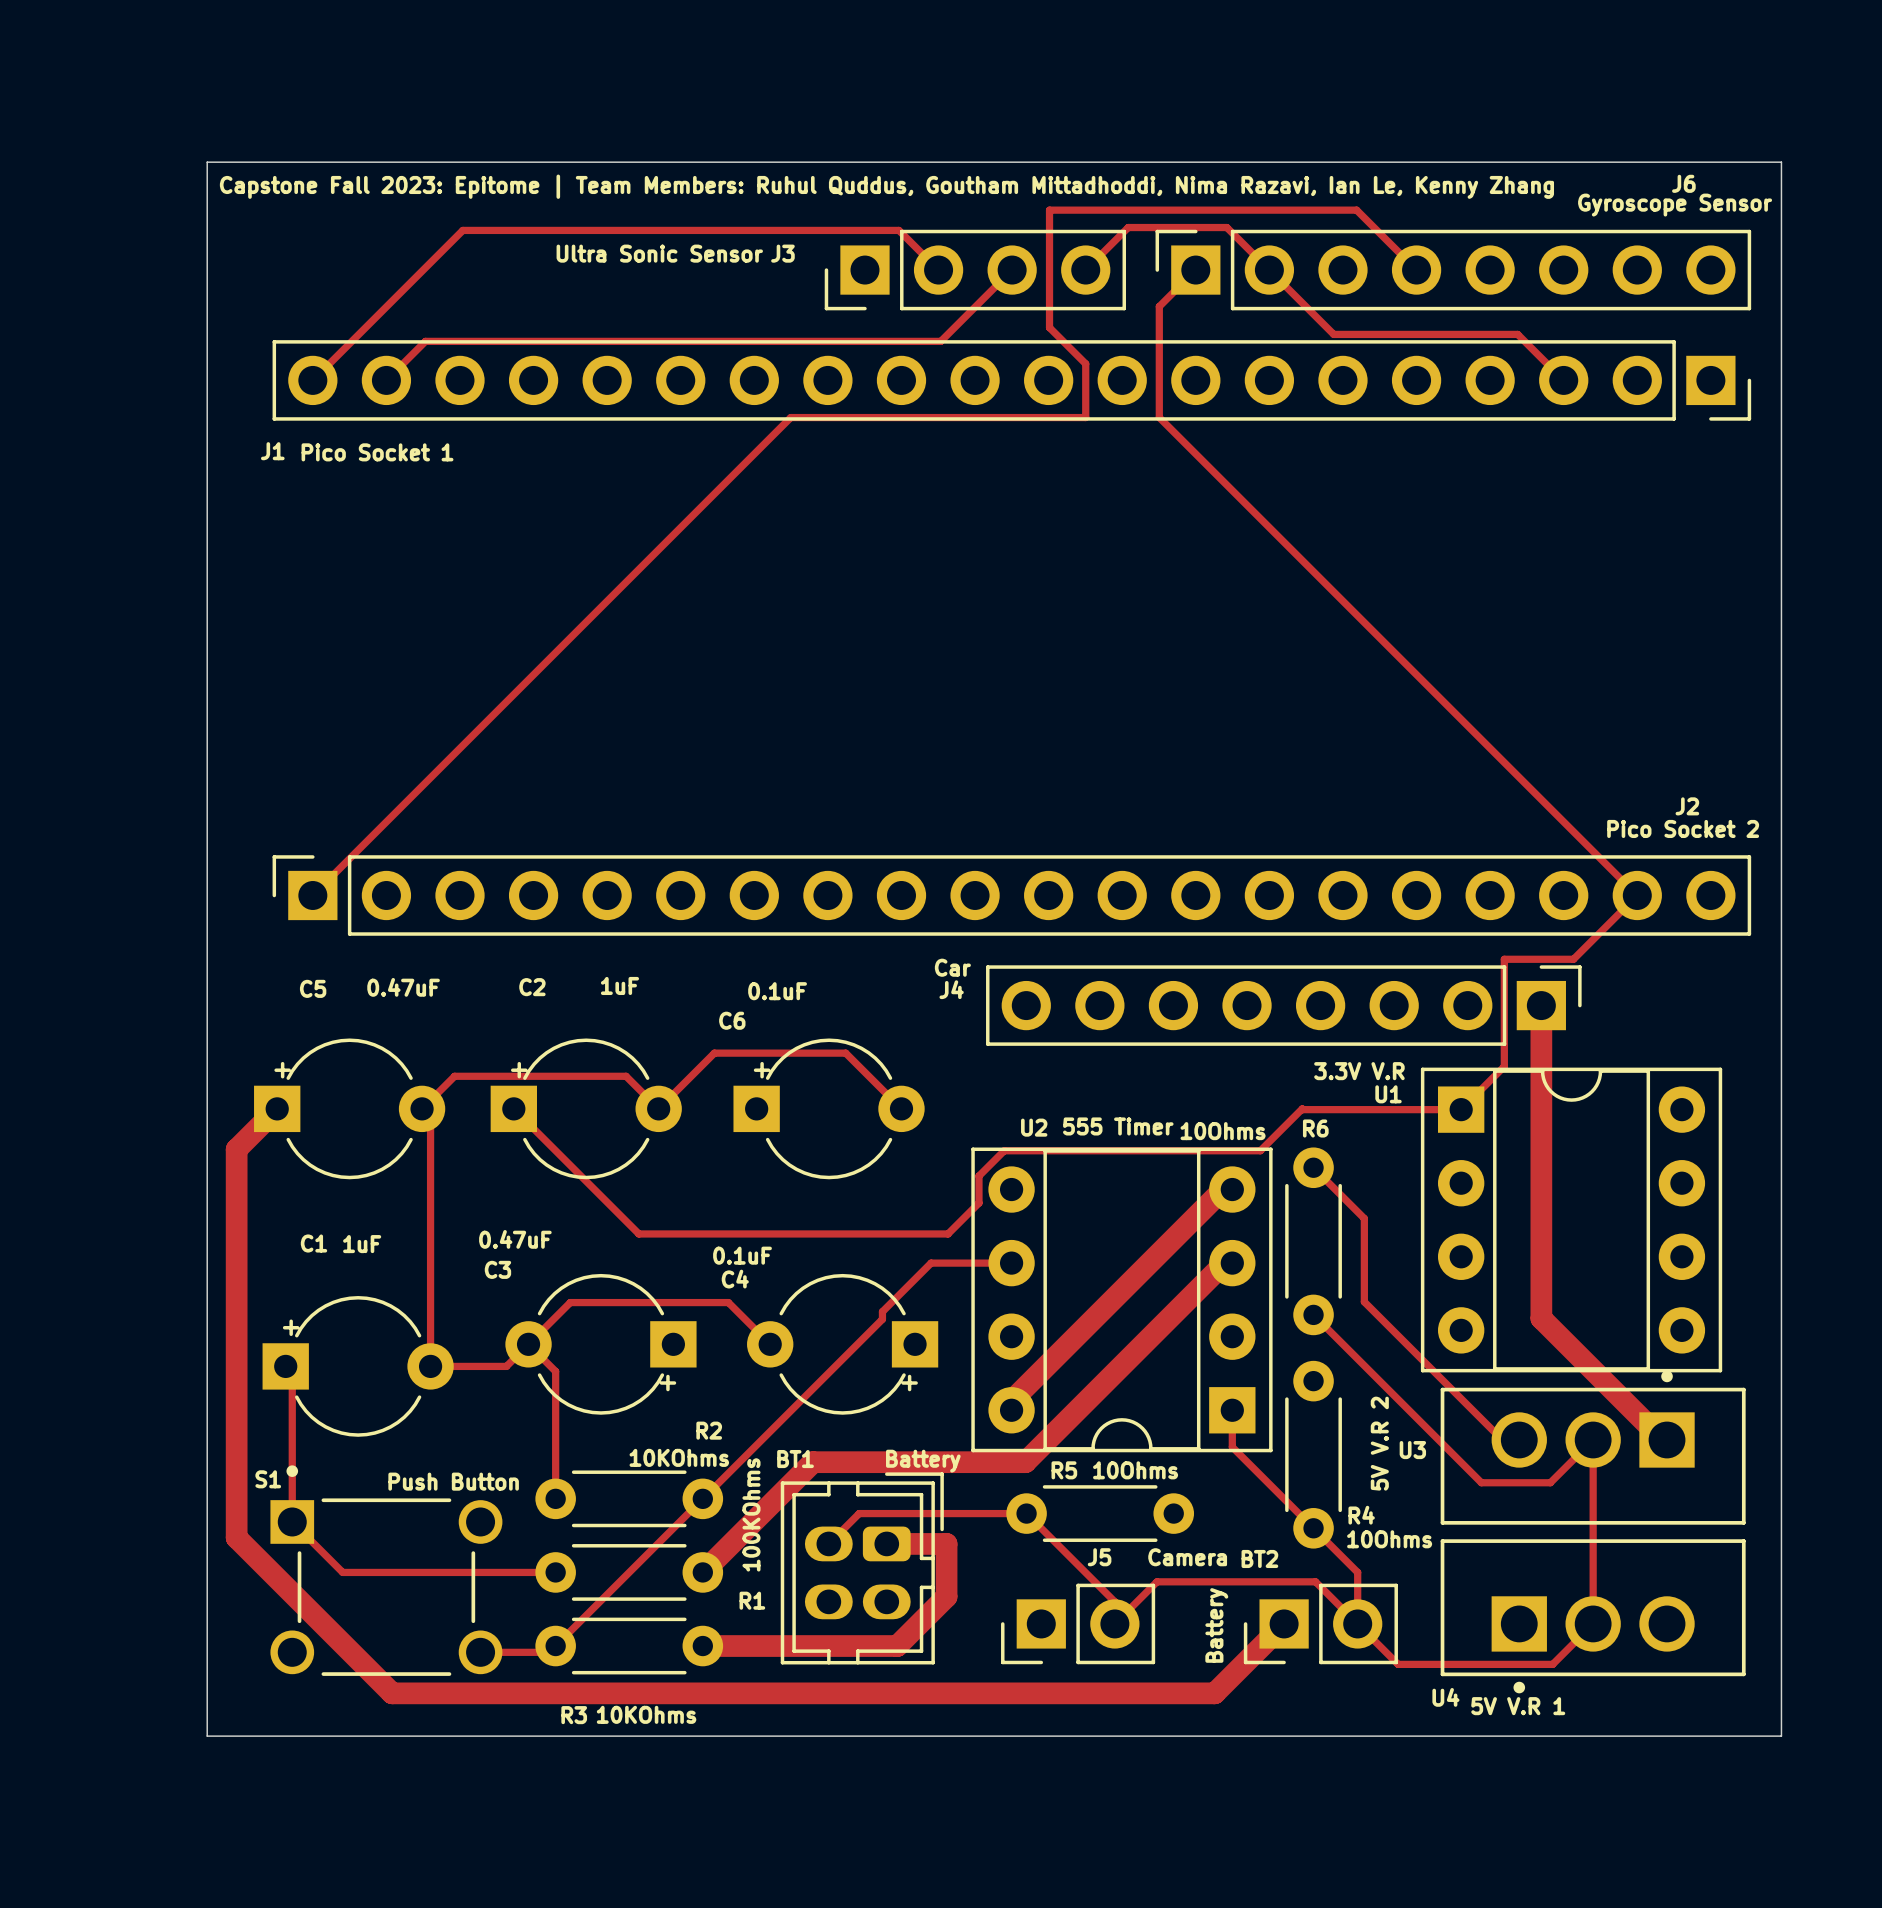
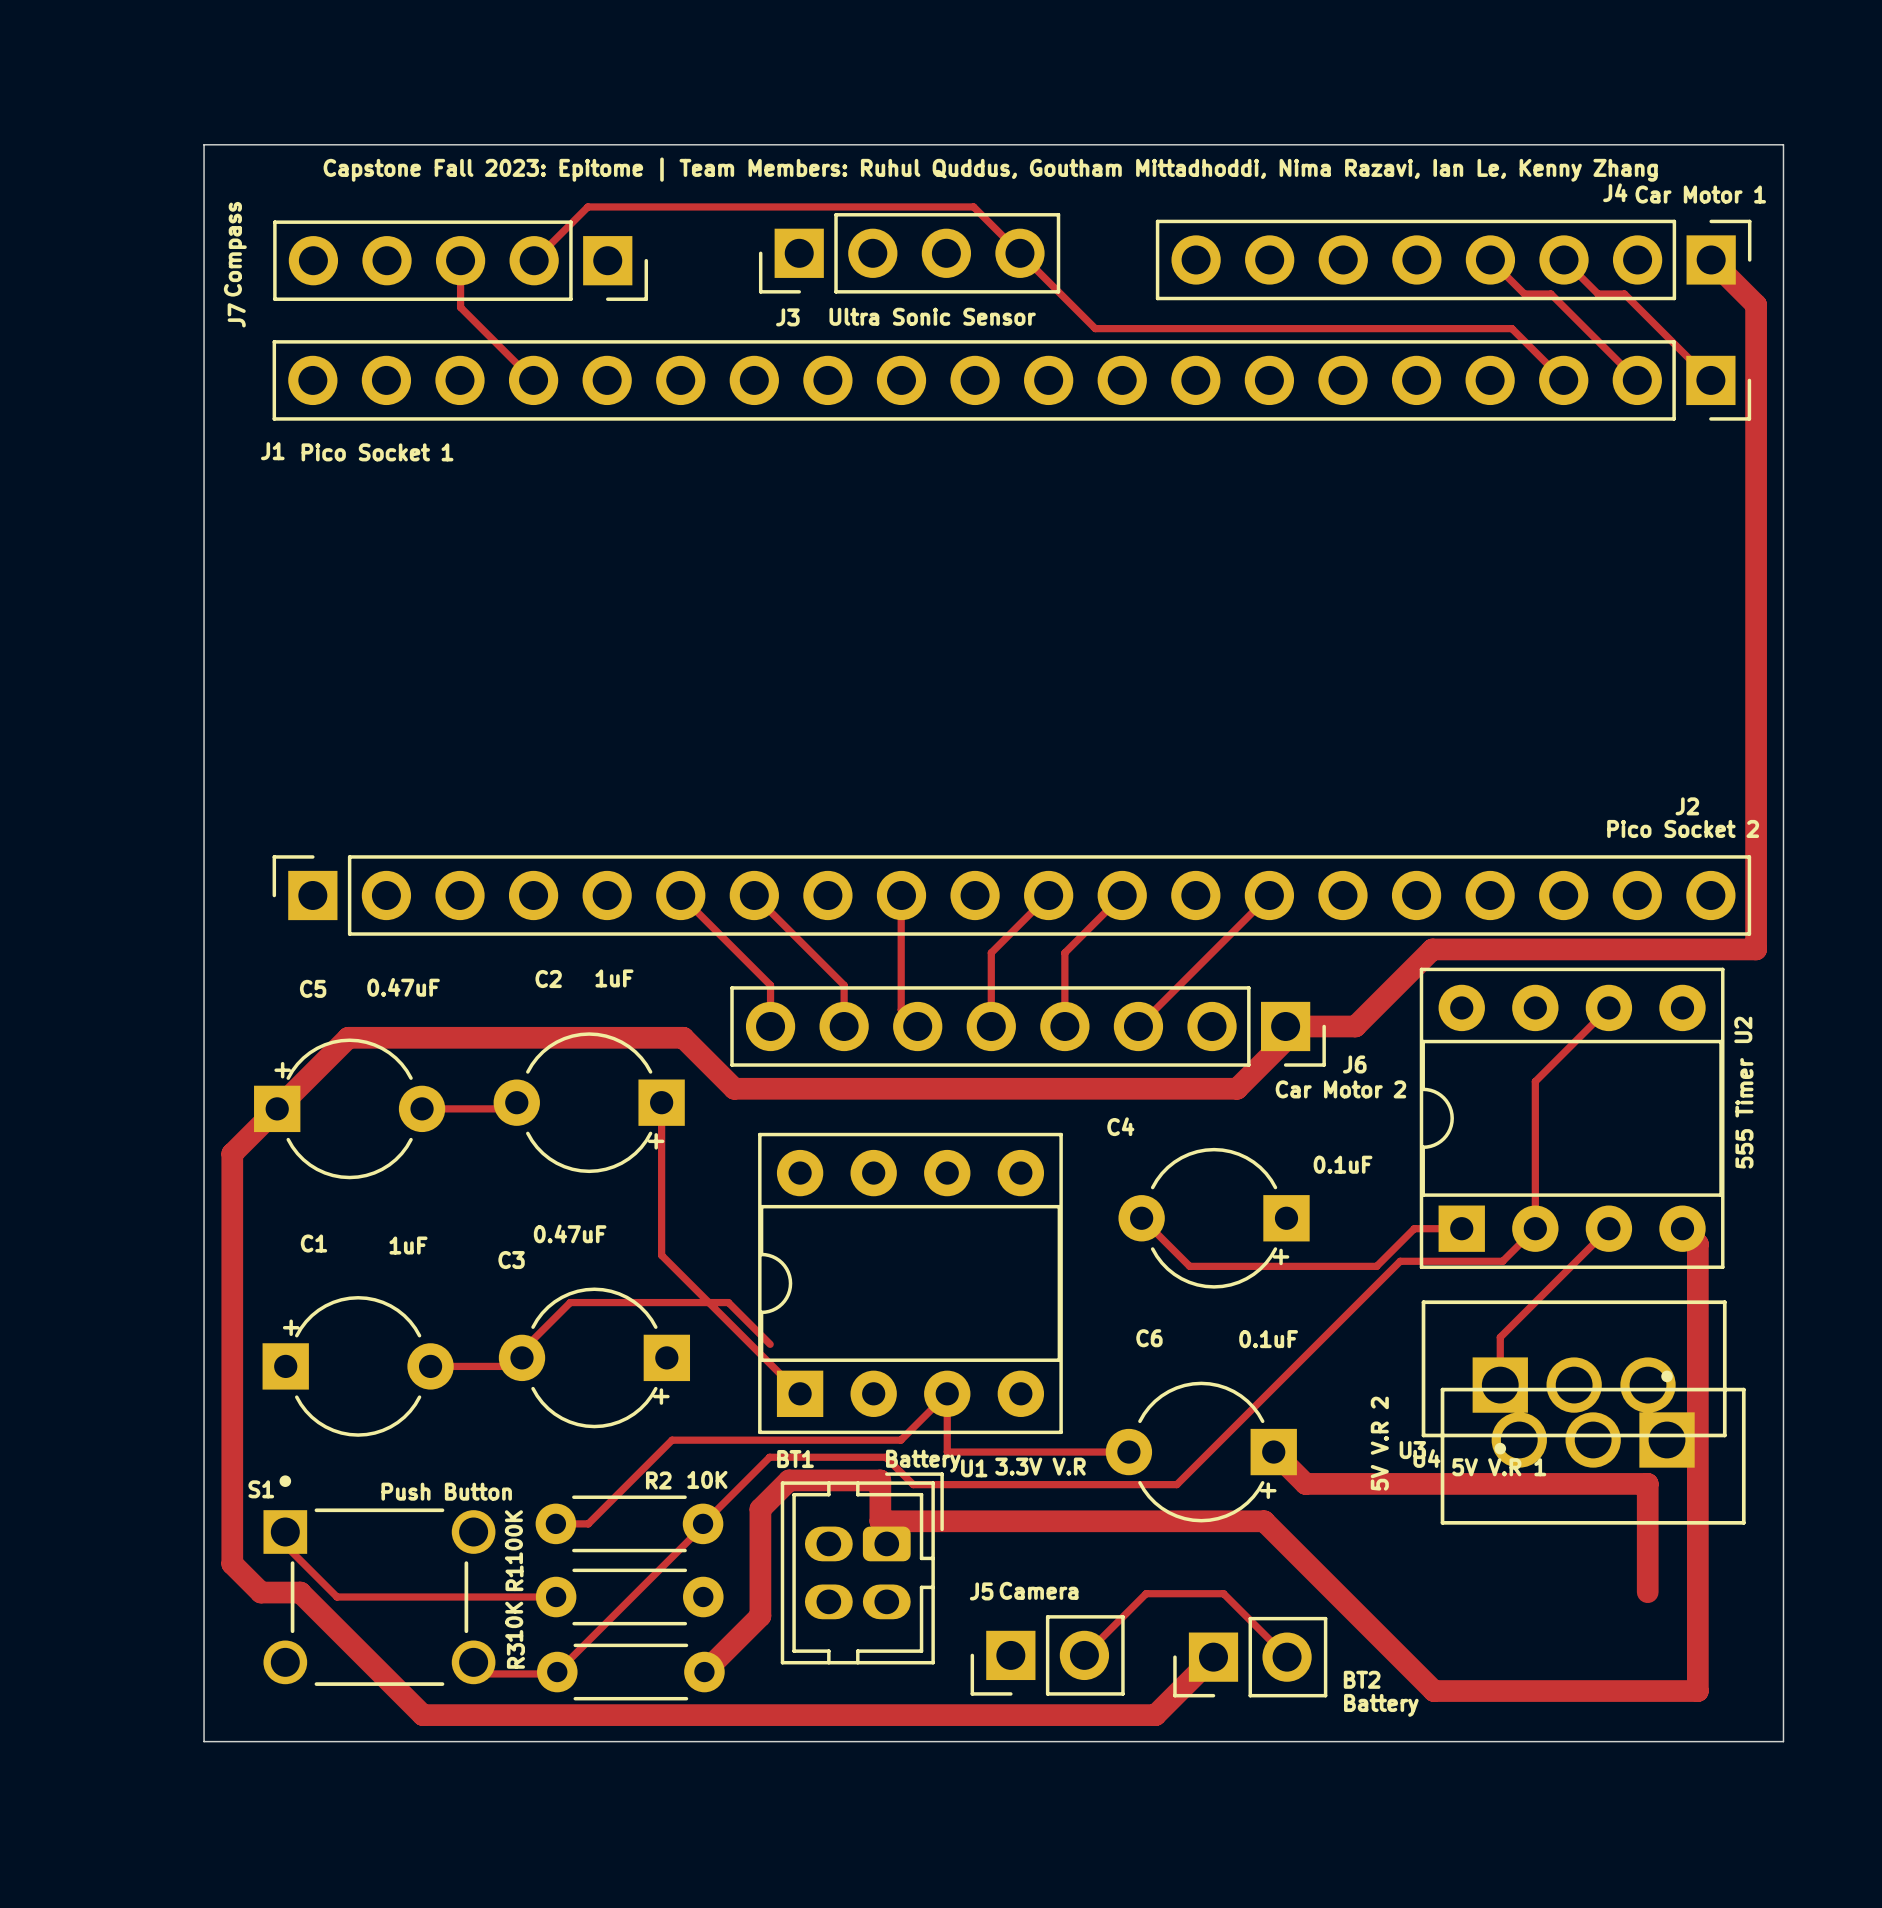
board edge: (207, 162) (1781, 162) (1781, 1736) (207, 1736) (207, 162) -> (204, 144) (204, 1741) (1783, 1741) (1783, 144) (204, 144)
J6 name position: J6 (1683, 183) -> J6 (1354, 1064)
text position: Capstone Fall 2023: Epitome | Team Members: Ruhul Quddus, Goutham Mittadhoddi, Nima Razavi, Ian Le, Kenny Zhang (886, 186) -> Capstone Fall 2023: Epitome | Team Members: Ruhul Quddus, Goutham Mittadhoddi, Nima Razavi, Ian Le, Kenny Zhang (990, 169)
J6 value: Gyroscope Sensor (1675, 205) -> Car Motor 2 (1340, 1089)
J3 value position: Ultra Sonic Sensor (659, 253) -> Ultra Sonic Sensor (932, 316)
J3 name position: J3 (782, 253) -> J3 (787, 317)
track: none -> (1490, 259) (1524, 294) (1550, 294) (1637, 380)
track: none -> (1564, 259) (1598, 294) (1624, 294) (1710, 380)
track: none -> (1711, 259) (1756, 304) (1756, 949) (1432, 949) (1355, 1026) (1285, 1026) (1285, 1040) (1237, 1088) (734, 1088) (683, 1037) (348, 1037) (252, 1133)
track: none -> (460, 260) (460, 307) (533, 380)
J7: none -> Compass (460, 260)
track: (938, 270) (898, 230) (462, 230) (312, 380) -> none
J3 position: (975, 270) -> (909, 253)
track: (1012, 270) (940, 341) (425, 341) (386, 380) -> none
track: (1085, 270) (1128, 227) (1226, 227) (1333, 334) (1517, 334) -> (534, 260) (587, 206) (973, 206) (1095, 328) (1511, 328) (1517, 334)
track: (1195, 270) (1159, 306) (1159, 417) (1637, 895) (1573, 959) (1504, 959) (1504, 1066) (1461, 1109) (1302, 1108) (1260, 1150) (1004, 1150) (978, 1176) (978, 1203) (948, 1233) (638, 1233) (513, 1108) -> none
track: (1416, 270) (1356, 210) (1049, 210) (1049, 327) (1085, 363) (1085, 417) (790, 417) (312, 895) -> none
J6 rotation: 0° (1453, 270) -> 180° (1028, 1026)
J6 position: (1453, 270) -> (1028, 1026)
track: none -> (680, 895) (770, 985) (770, 1026)
track: none -> (754, 895) (844, 985) (844, 1026)
track: none -> (901, 895) (901, 1009) (917, 1026)
track: none -> (1048, 895) (991, 952) (991, 1026)
track: none -> (1122, 895) (1064, 952) (1064, 1026)
track: none -> (1269, 895) (1138, 1026)
J4 value: Car (952, 967) -> Car Motor 1 (1700, 194)
J4 name position: J4 (951, 989) -> J4 (1615, 192)
C6 value position: 0.1uF (777, 991) -> 0.1uF (1268, 1339)
J4 position: (1283, 1005) -> (1453, 259)
track: (1541, 1005) (1541, 1318) (1662, 1439) (1667, 1439) -> none
track: none -> (1608, 1007) (1535, 1081) (1535, 1228) (1502, 1261) (1400, 1261) (1176, 1484) (913, 1484) (885, 1457) (769, 1457) (555, 1673) (471, 1673)
U1 value position: 3.3V V.R (1359, 1071) -> 3.3V V.R (1040, 1466)
U1 name position: U1 (1388, 1094) -> U1 (974, 1468)
track: none -> (516, 1102) (510, 1108) (422, 1108)
track: none -> (661, 1102) (661, 1255) (800, 1393)
C2 rotation: 0° (586, 1108) -> 180° (589, 1102)
C6 rotation: 0° (829, 1108) -> 180° (1201, 1452)
C6 position: (829, 1108) -> (1201, 1452)
track: (901, 1108) (845, 1053) (714, 1053) (658, 1108) (626, 1076) (454, 1076) (422, 1108) (430, 1117) (430, 1366) -> none
track: (236, 1149) (236, 1537) (392, 1693) (1214, 1693) (1284, 1623) -> (236, 1149) (232, 1153) (232, 1563) (260, 1592) (300, 1592) (422, 1715) (1155, 1715) (1213, 1657)
track: (1313, 1167) (1364, 1218) (1364, 1301) (1502, 1439) (1519, 1439) -> none
track: (1232, 1189) (1223, 1189) (1011, 1401) (1011, 1410) -> none
track: none -> (1461, 1215) (1461, 1228) (1414, 1228) (1376, 1266) (1189, 1266) (1141, 1218)
U1 rotation: 0° (1571, 1220) -> 90° counterclockwise (910, 1283)
U1 position: (1571, 1220) -> (910, 1283)
track: none -> (1608, 1228) (1500, 1337) (1500, 1385)
track: none -> (1682, 1228) (1697, 1244) (1697, 1691) (1433, 1691) (1264, 1521) (880, 1521) (880, 1480) (789, 1480) (760, 1509) (760, 1616) (704, 1672)
C3 value position: 0.47uF (515, 1239) -> 0.47uF (570, 1233)
R6: 10Ohms (1313, 1241) -> none
C1 value position: 1uF (362, 1244) -> 1uF (408, 1245)
C4 value position: 0.1uF (742, 1255) -> 0.1uF (1343, 1164)
track: (1011, 1263) (931, 1263) (882, 1311) (882, 1319) (549, 1652) (480, 1652) -> none
track: (1232, 1263) (1224, 1263) (1025, 1462) (813, 1462) (702, 1572) (712, 1582) -> none
C3 name position: C3 (497, 1269) -> C3 (511, 1260)
C4 name position: C4 (735, 1279) -> C4 (1120, 1126)
U2 rotation: 0° (1121, 1299) -> 90° clockwise (1572, 1118)
U2 position: (1121, 1299) -> (1572, 1118)
track: (1313, 1314) (1481, 1482) (1550, 1482) (1593, 1439) (1593, 1623) (1552, 1664) (1398, 1664) (1315, 1581) (1156, 1581) (1114, 1623) (1114, 1601) (1026, 1513) (859, 1513) (828, 1543) -> none
track: (528, 1344) (555, 1371) (555, 1498) -> none
C3 position: (600, 1344) -> (594, 1357)
C4 position: (842, 1344) -> (1214, 1218)
track: (285, 1366) (292, 1372) (292, 1521) (342, 1572) (555, 1572) -> none
track: (1232, 1410) (1232, 1447) (1357, 1572) (1357, 1623) -> none
R2 name position: R2 (709, 1430) -> R2 (658, 1480)
track: none -> (1128, 1452) (947, 1452) (947, 1393) (900, 1440) (672, 1440) (588, 1523) (555, 1523)
track: none -> (1273, 1452) (1305, 1483) (1647, 1483) (1647, 1592)
R4: 10Ohms (1313, 1454) -> none
R2 value: 10KOhms (679, 1457) -> 10K (707, 1479)
R2 position: (629, 1498) -> (629, 1523)
R5: 10Ohms (1100, 1513) -> none
R1 value: 100KOhms (751, 1514) -> 100K (513, 1537)
track: none -> (283, 1543) (337, 1597) (556, 1597)
track: (886, 1543) (946, 1543) (946, 1596) (897, 1646) (702, 1646) -> none
J5 name position: J5 (1099, 1557) -> J5 (981, 1591)
J5 value position: Camera (1187, 1557) -> Camera (1039, 1590)
BT2 name position: BT2 (1259, 1558) -> BT2 (1362, 1679)
S1 position: (386, 1570) -> (379, 1580)
R1 position: (629, 1572) -> (629, 1597)
R1 name rotation: 0° (752, 1600) -> 90° counterclockwise (514, 1578)
R1 name position: R1 (752, 1600) -> R1 (514, 1578)
U4 position: (1593, 1616) -> (1574, 1377)
J5 position: (1078, 1623) -> (1047, 1655)
BT2 position: (1320, 1623) -> (1250, 1657)
BT2 value rotation: 0° (1216, 1625) -> 90° clockwise (1381, 1705)
BT2 value position: Battery (1216, 1625) -> Battery (1381, 1705)
R3 position: (629, 1646) -> (630, 1672)
track: none -> (1084, 1655) (1146, 1593) (1223, 1593) (1287, 1657)
R3 value: 10KOhms (646, 1714) -> 10K (514, 1621)
R3 name rotation: 0° (574, 1715) -> 90° counterclockwise (515, 1655)
R3 name position: R3 (574, 1715) -> R3 (515, 1655)

